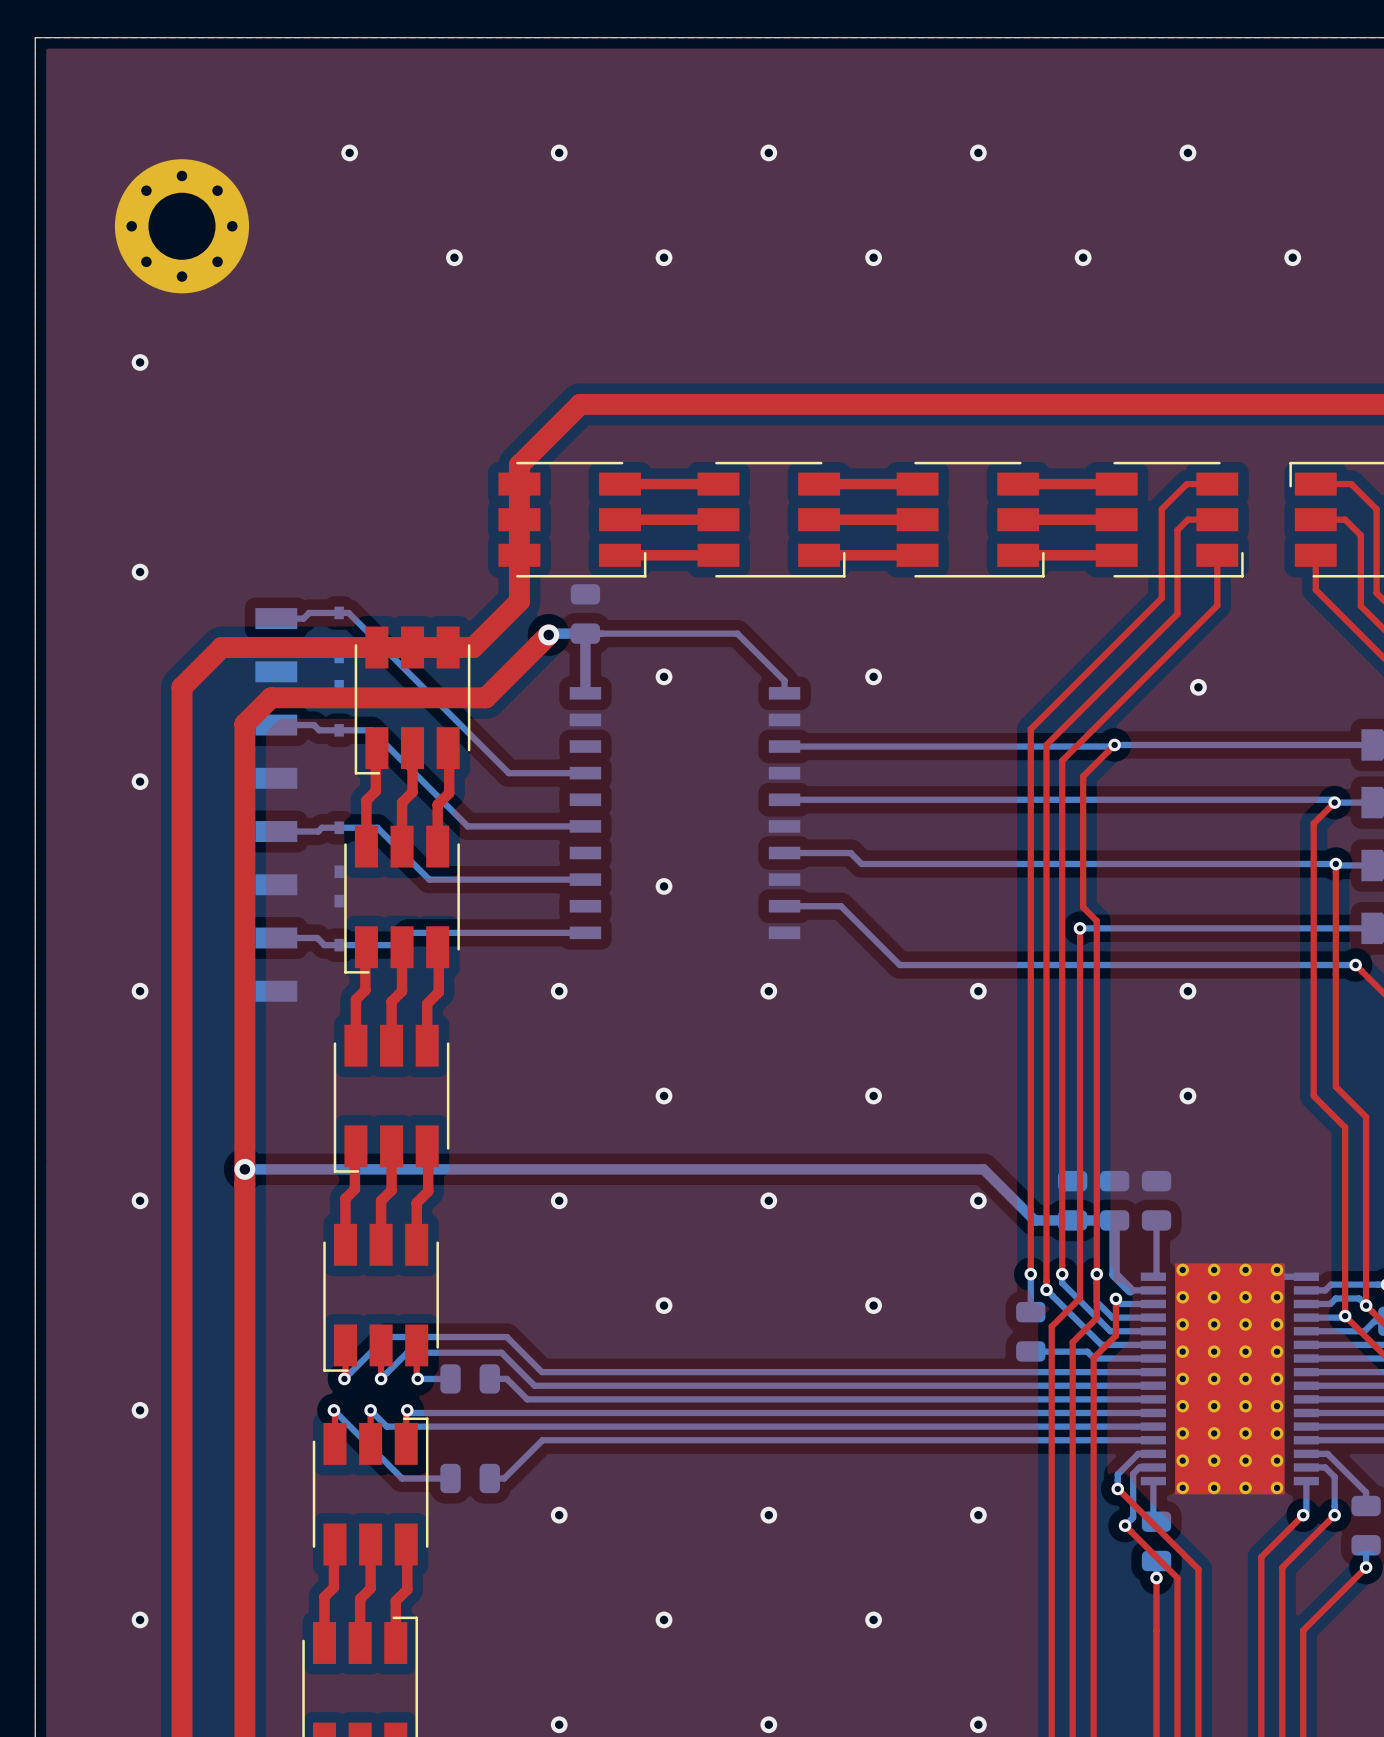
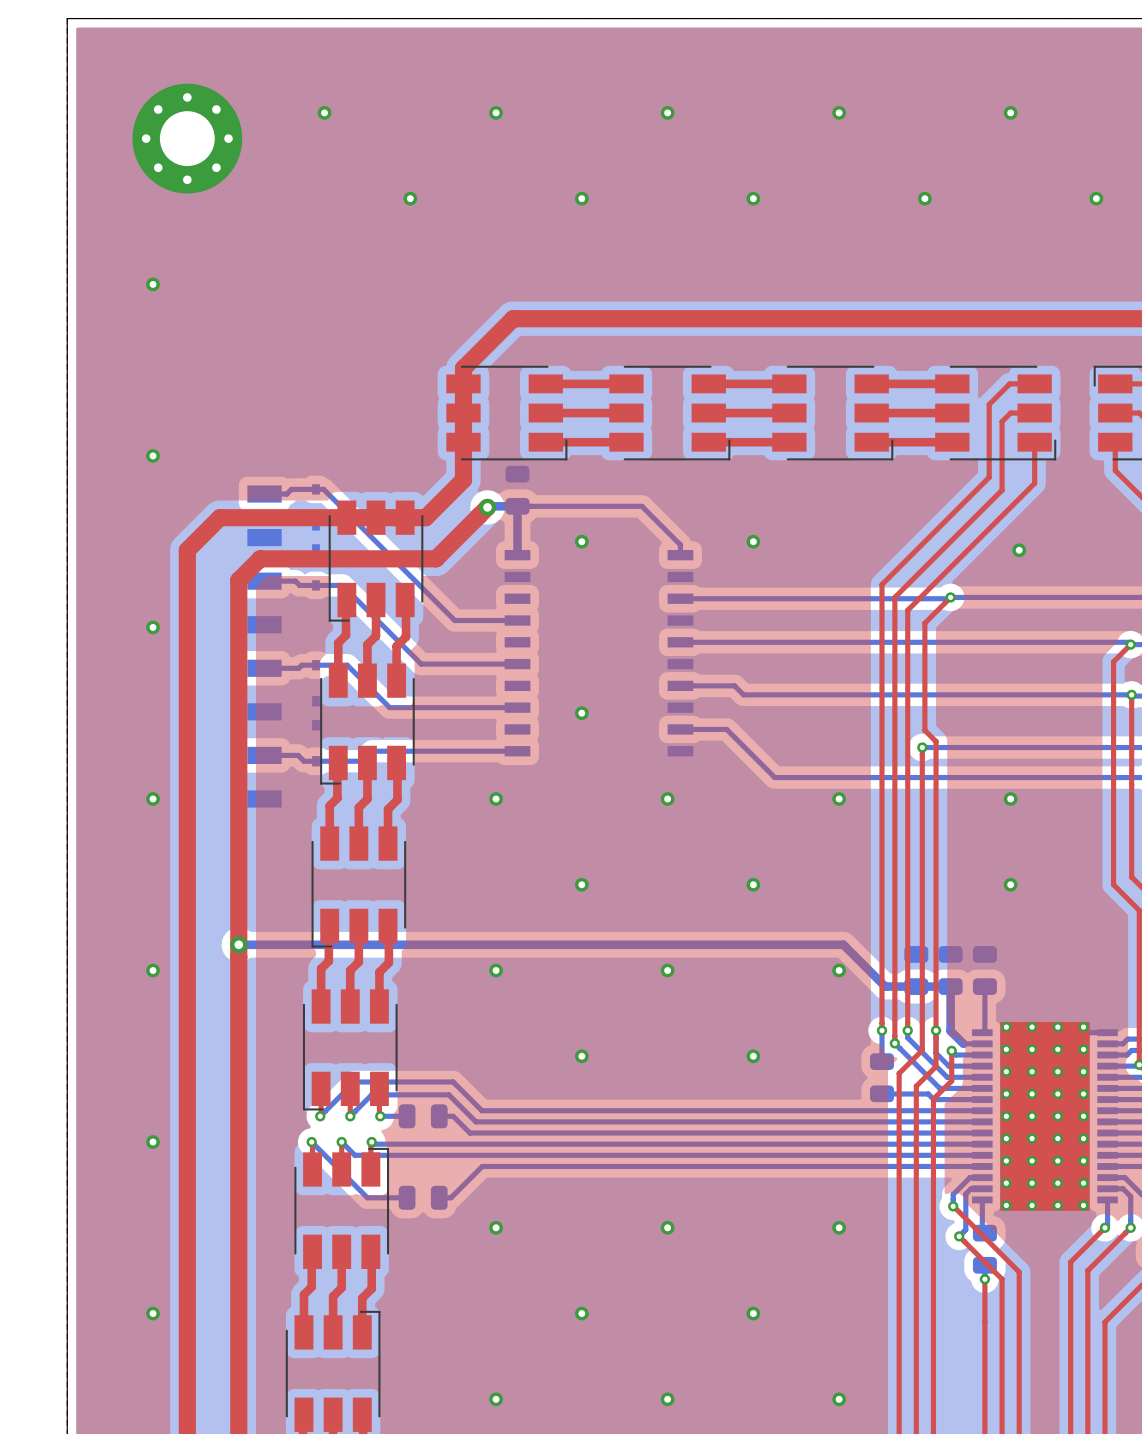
part position: (181, 226) -> (187, 138)

